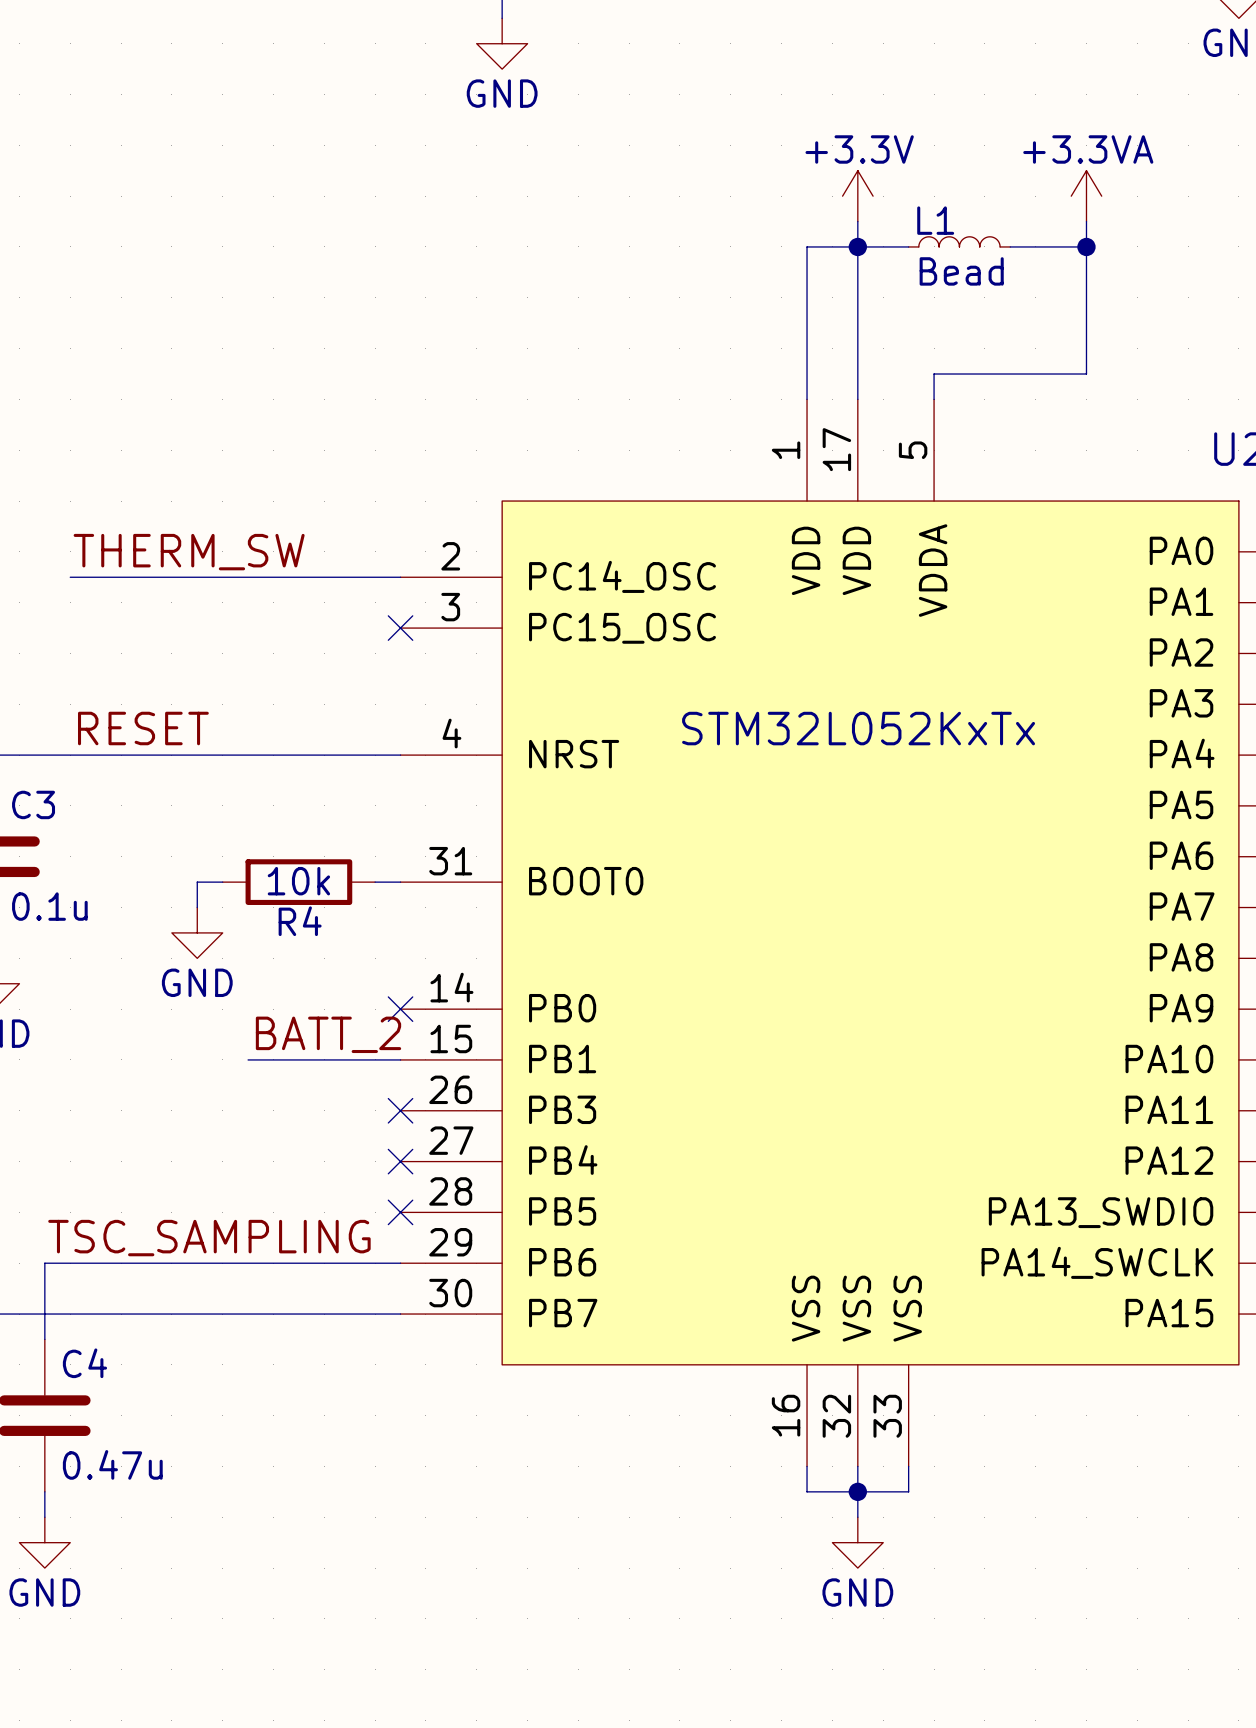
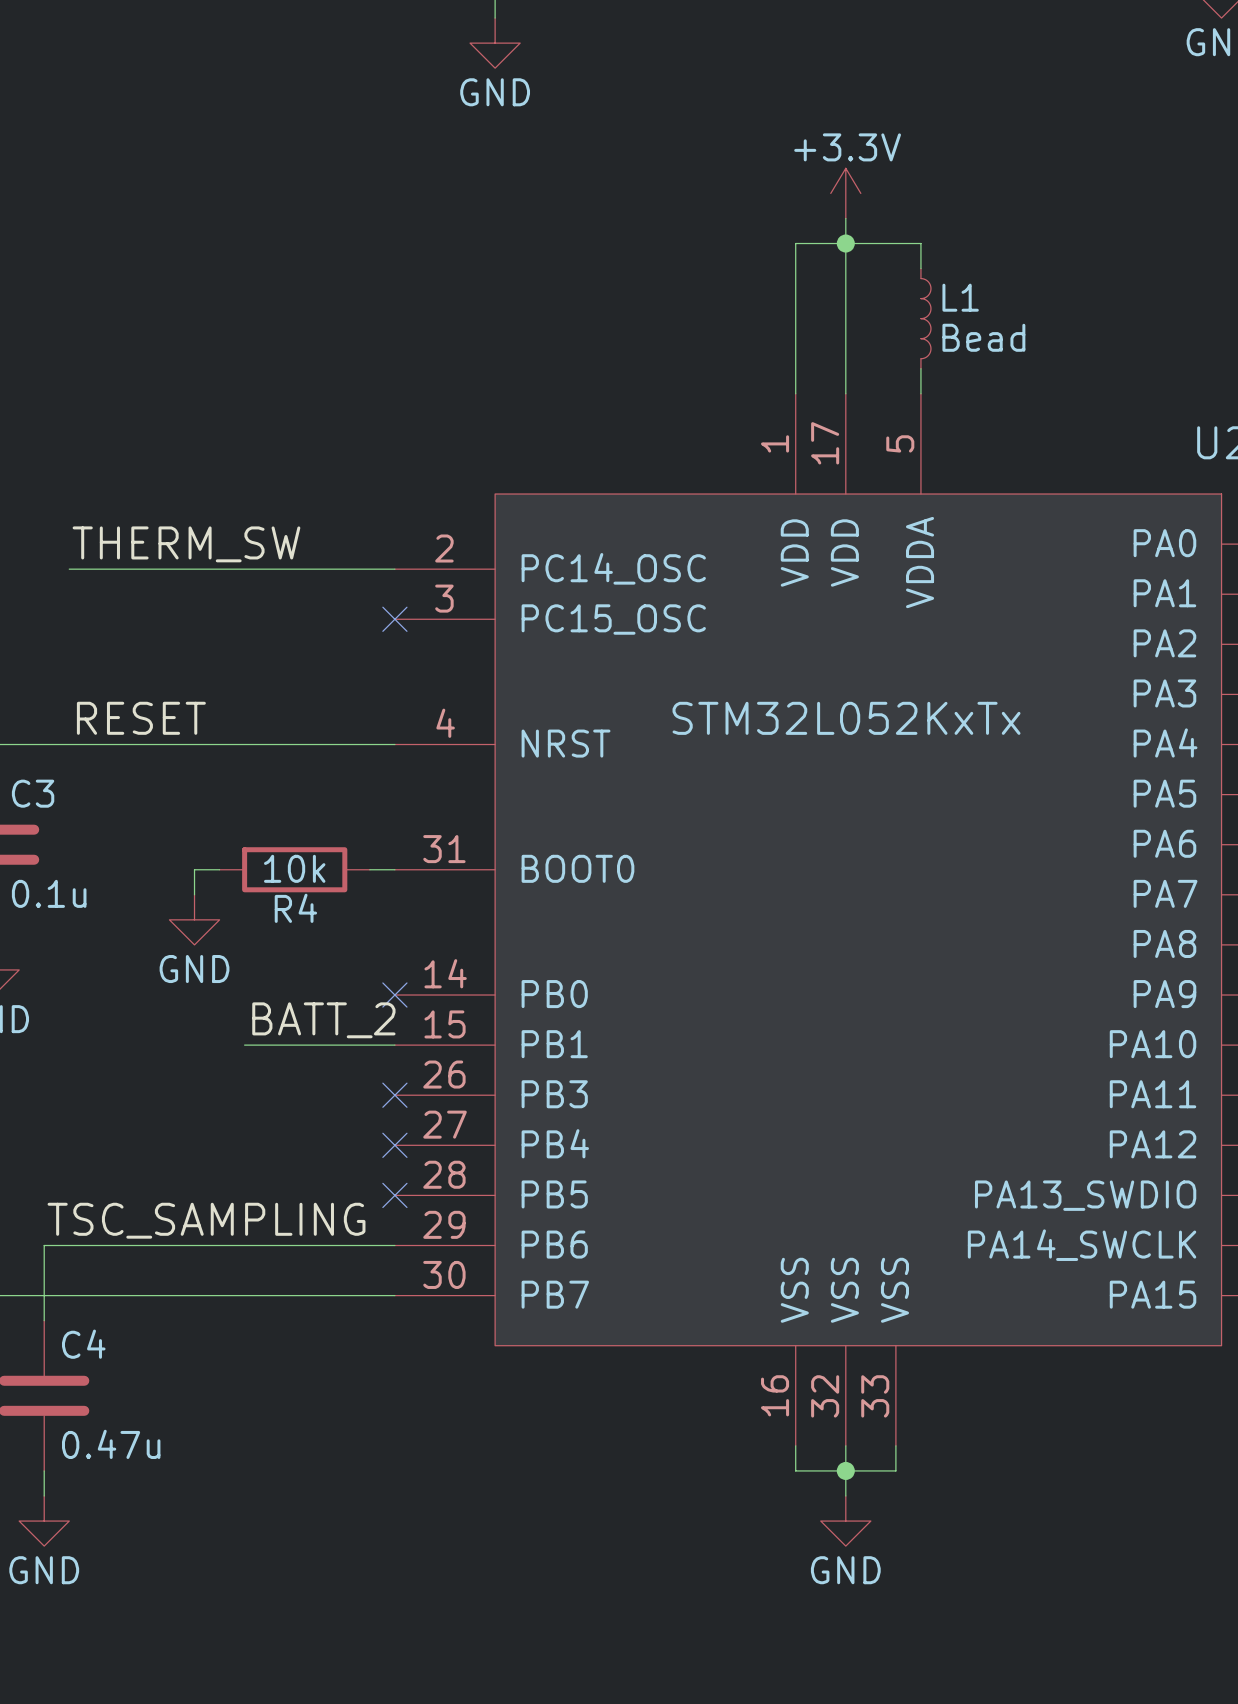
power symbol: +3.3VA (1086, 196) -> none
wire: (1086, 221) (1086, 374) (934, 374) -> none
L1 rotation: 0° (959, 241) -> 90° clockwise (925, 318)
L1 position: (959, 241) -> (925, 318)
wire: none -> (895, 243) (920, 243) (920, 268)
wire: (1010, 246) (1086, 246) -> none
junction: (1086, 246) -> none
L1 value position: Bead (961, 271) -> Bead (983, 337)

